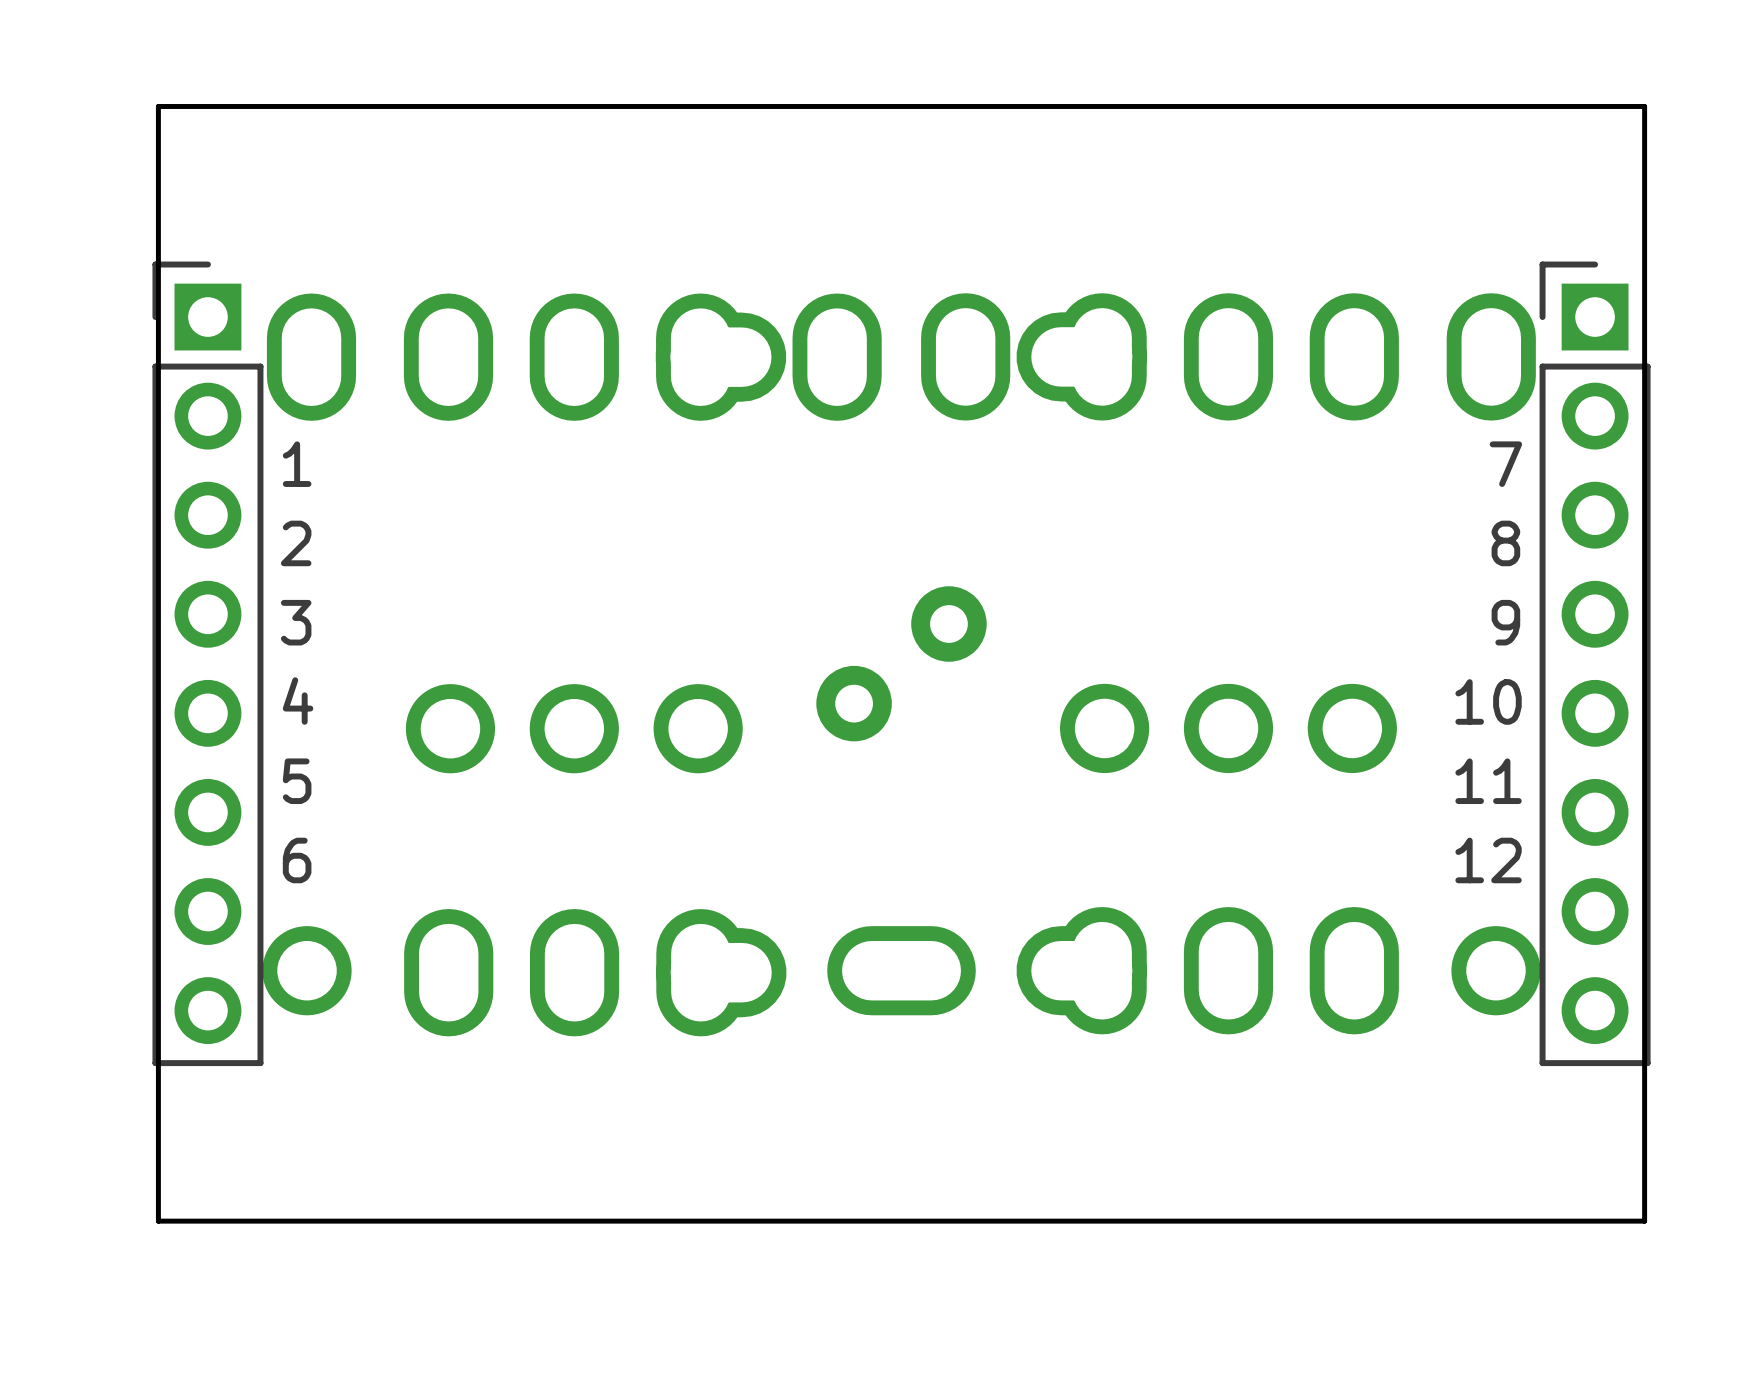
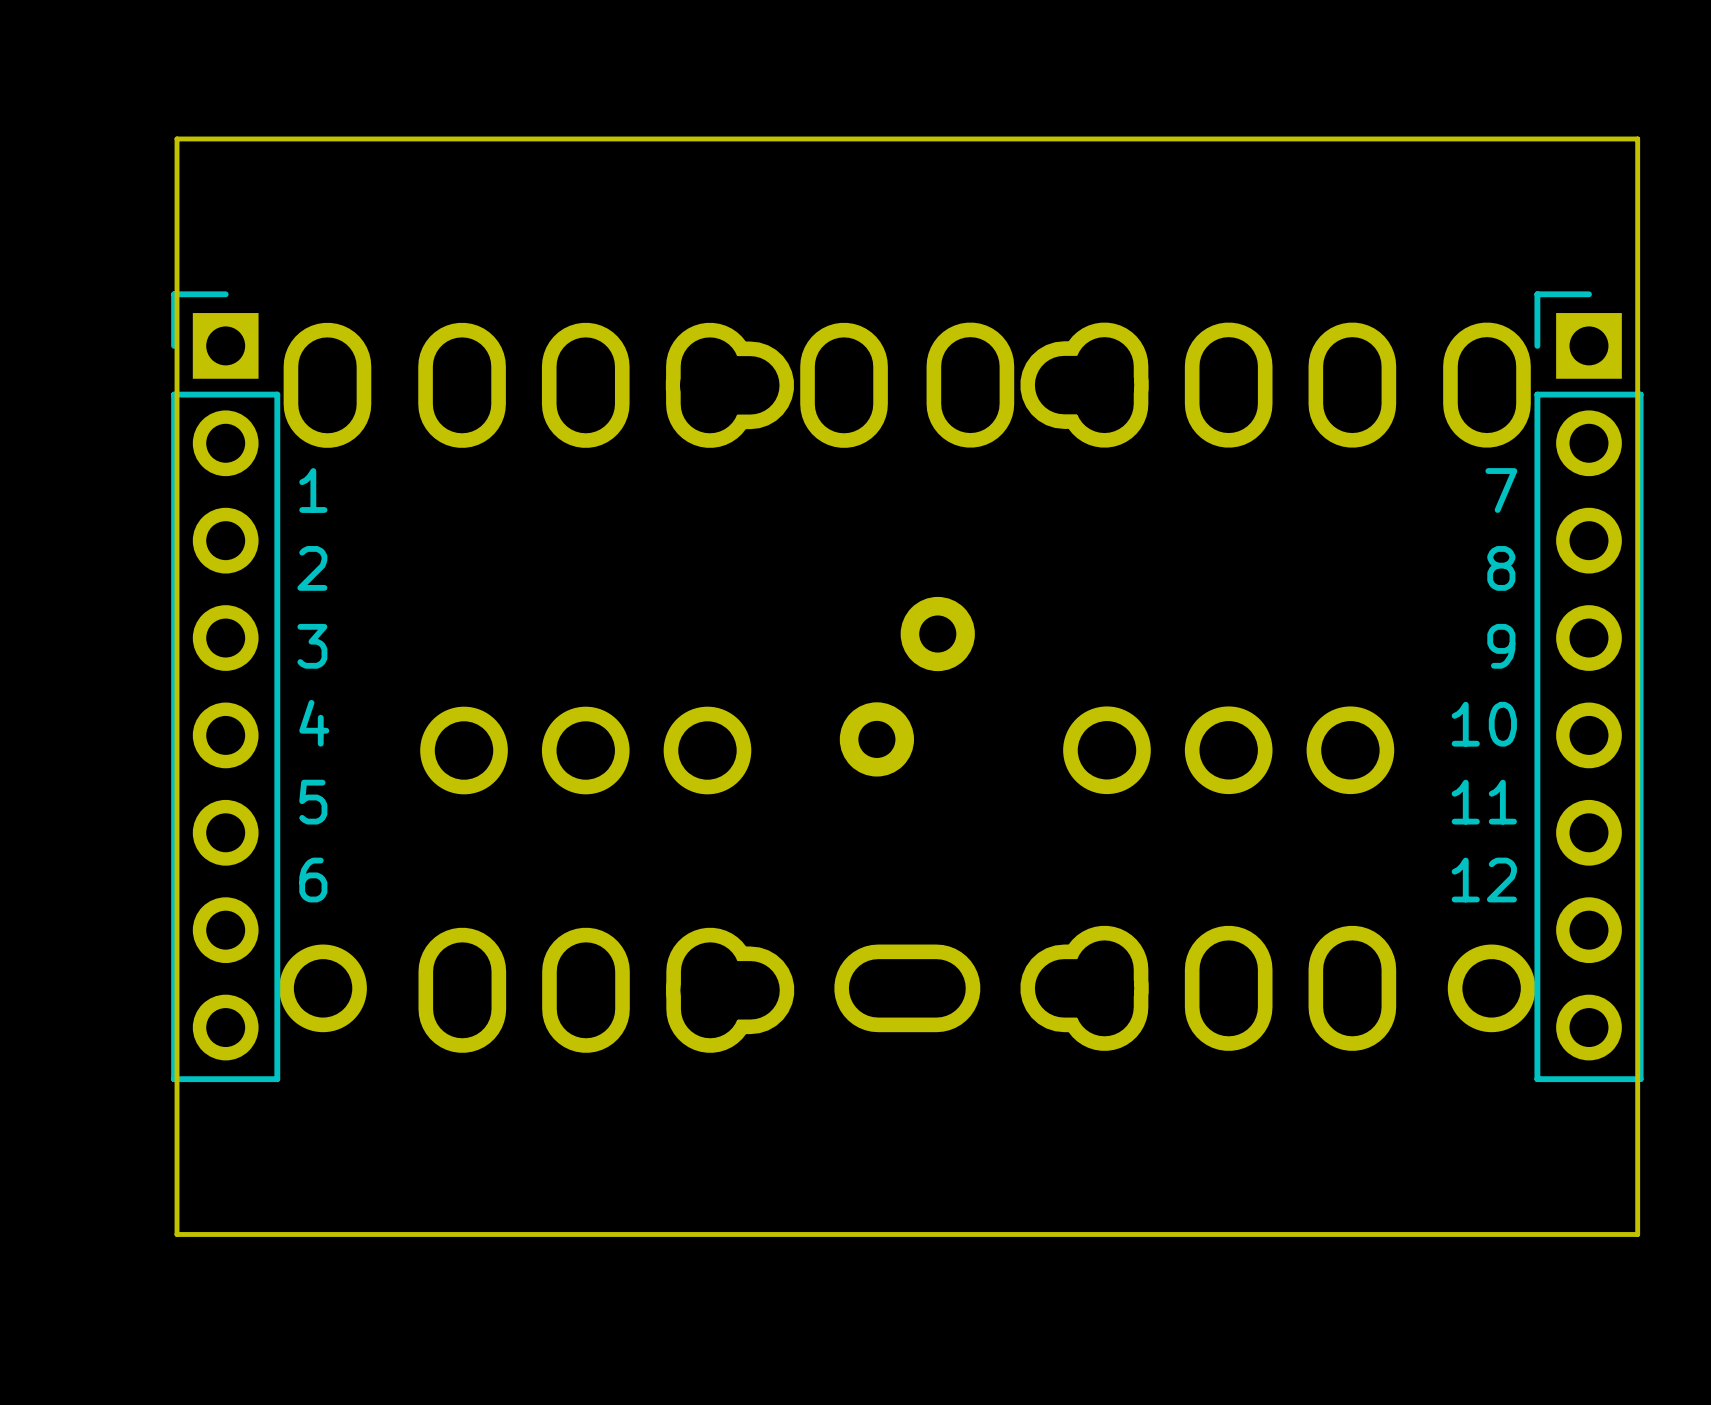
part rotation: 0° (901, 663) -> 20° counterclockwise (907, 686)

